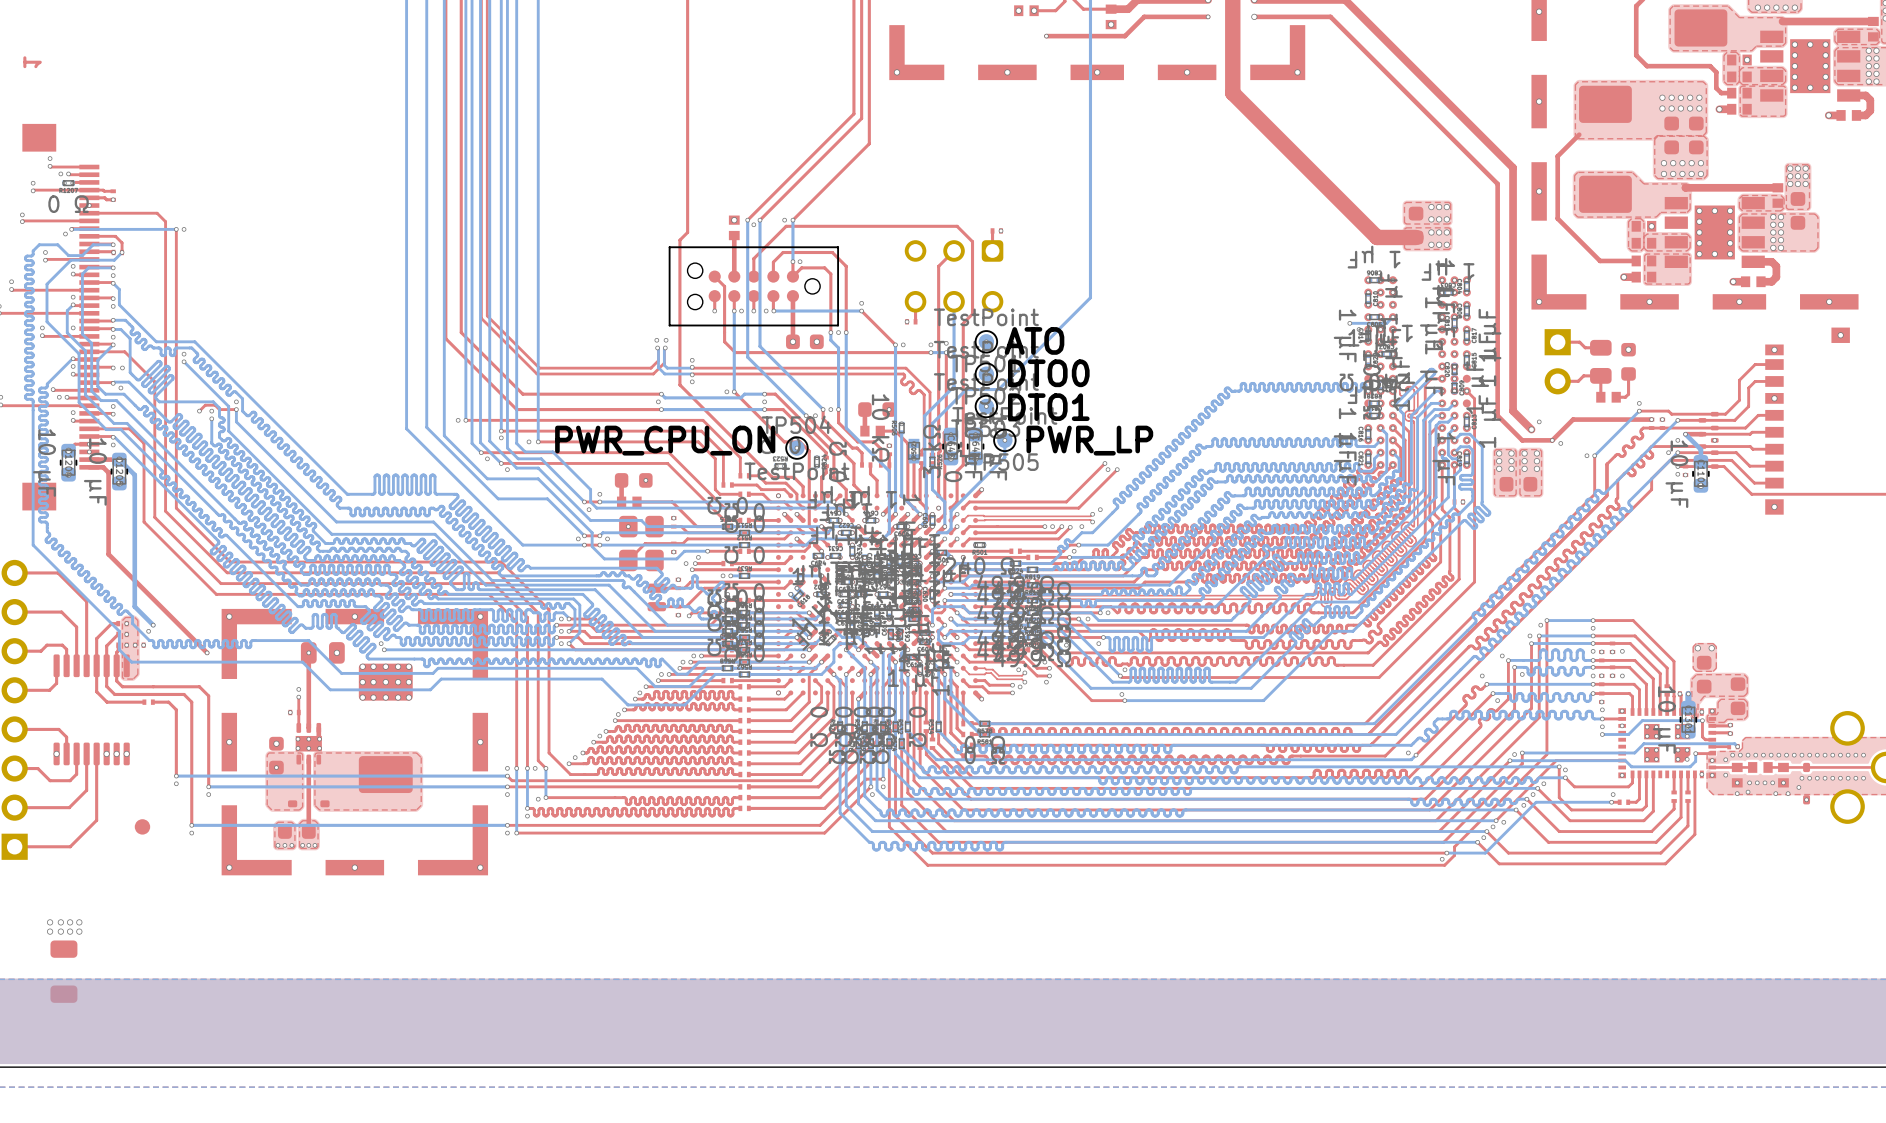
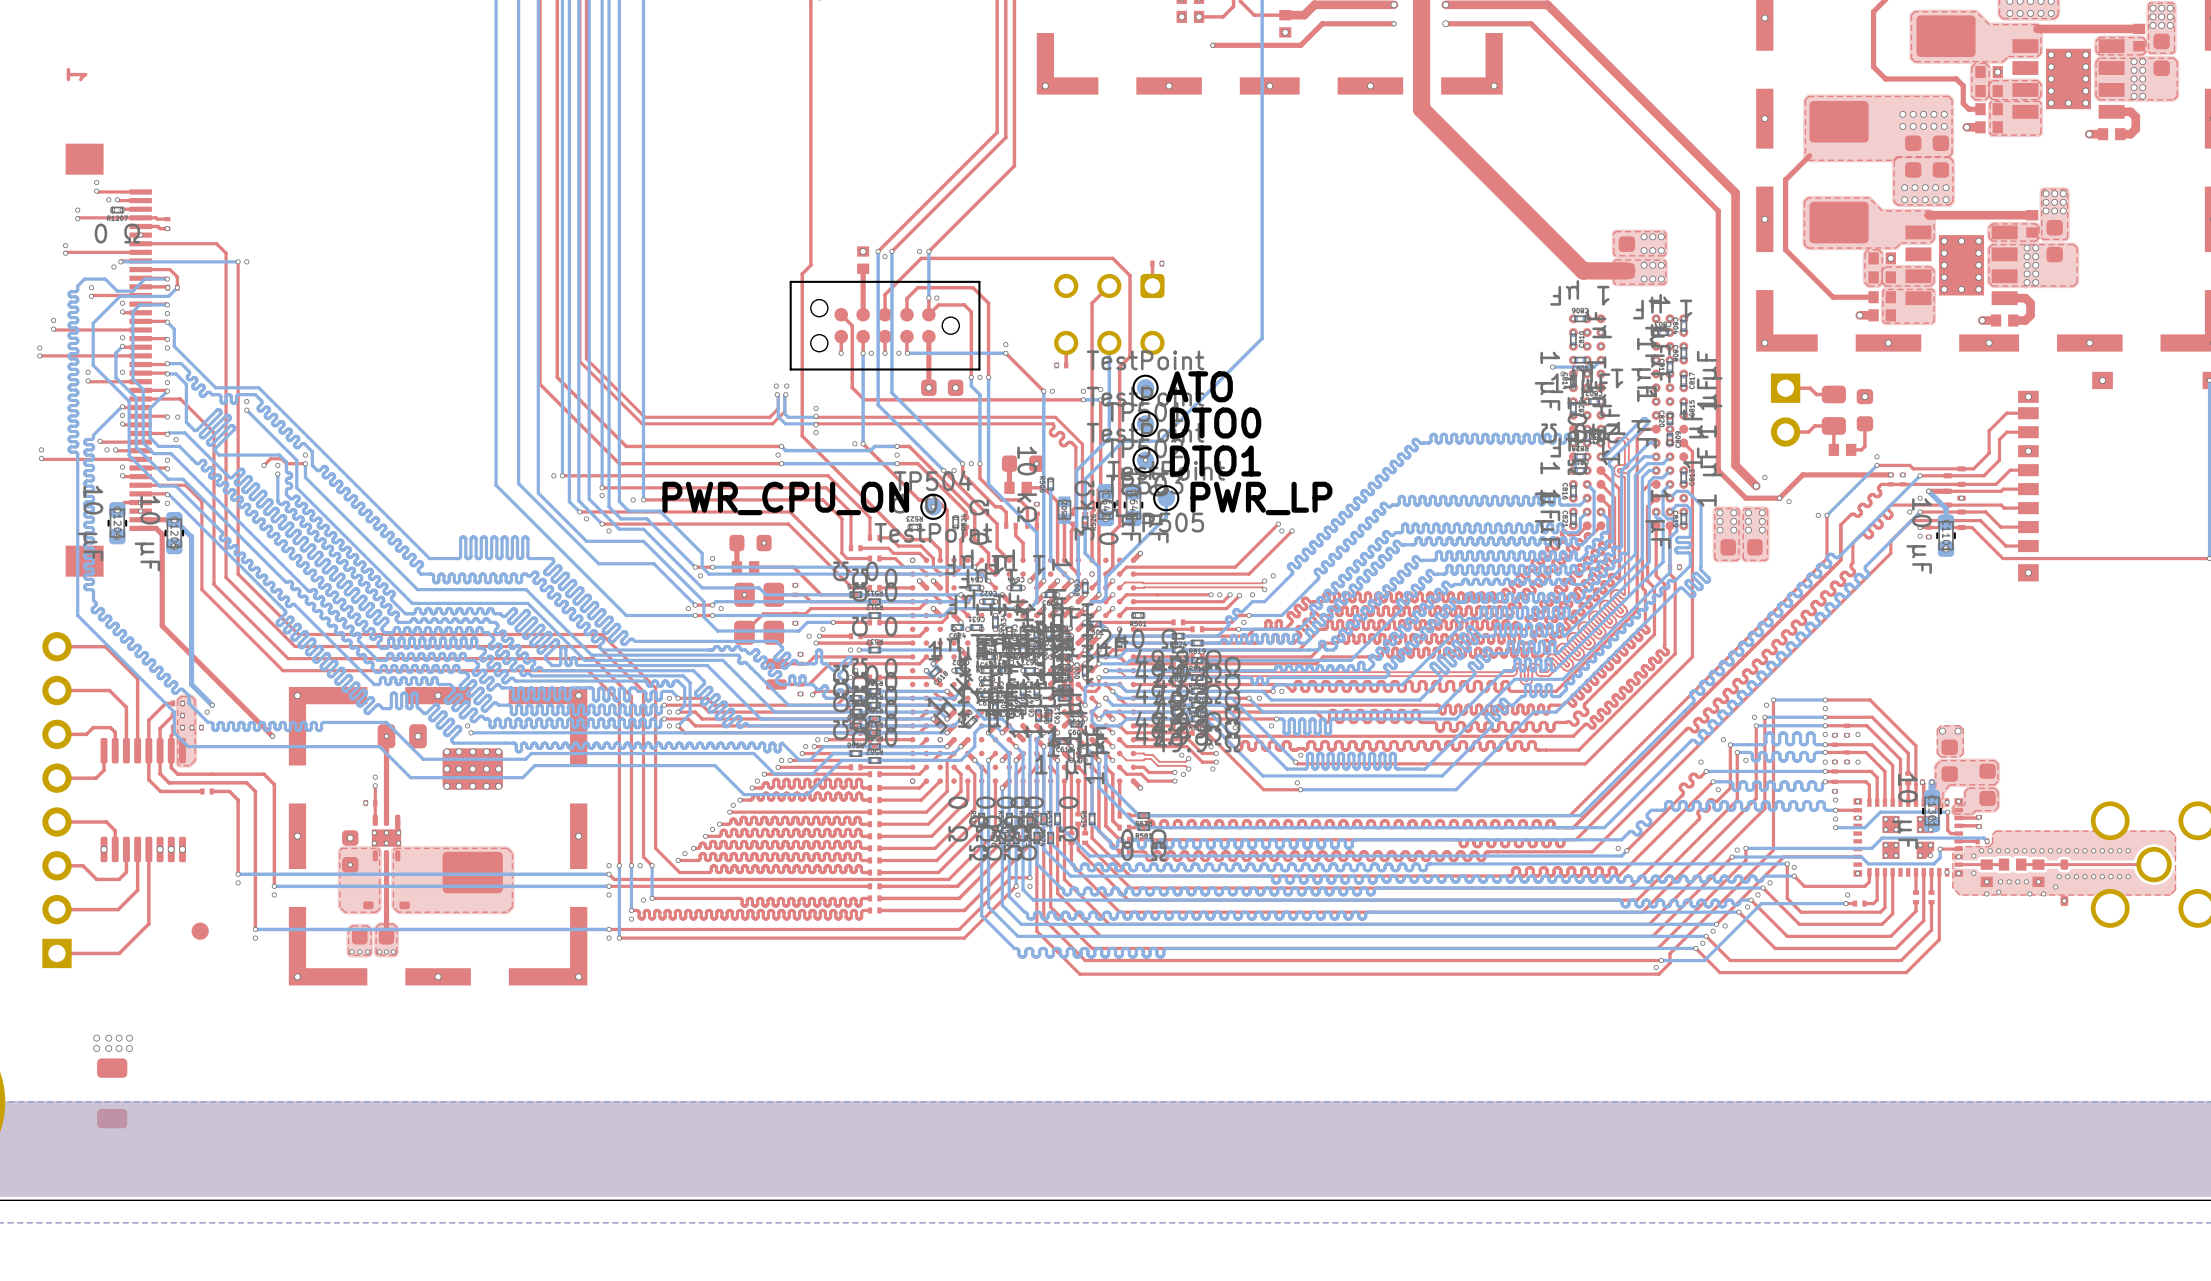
via: (1442, 378) -> none
via: (1466, 391) -> none
via: (1392, 415) -> none
via: (1392, 428) -> none
via: (1442, 428) -> none
via: (1004, 440) -> none
via: (1392, 440) -> none
via: (1442, 440) -> none
via: (1380, 465) -> none
via: (1392, 465) -> none
via: (1442, 465) -> none
via: (1454, 465) -> none

